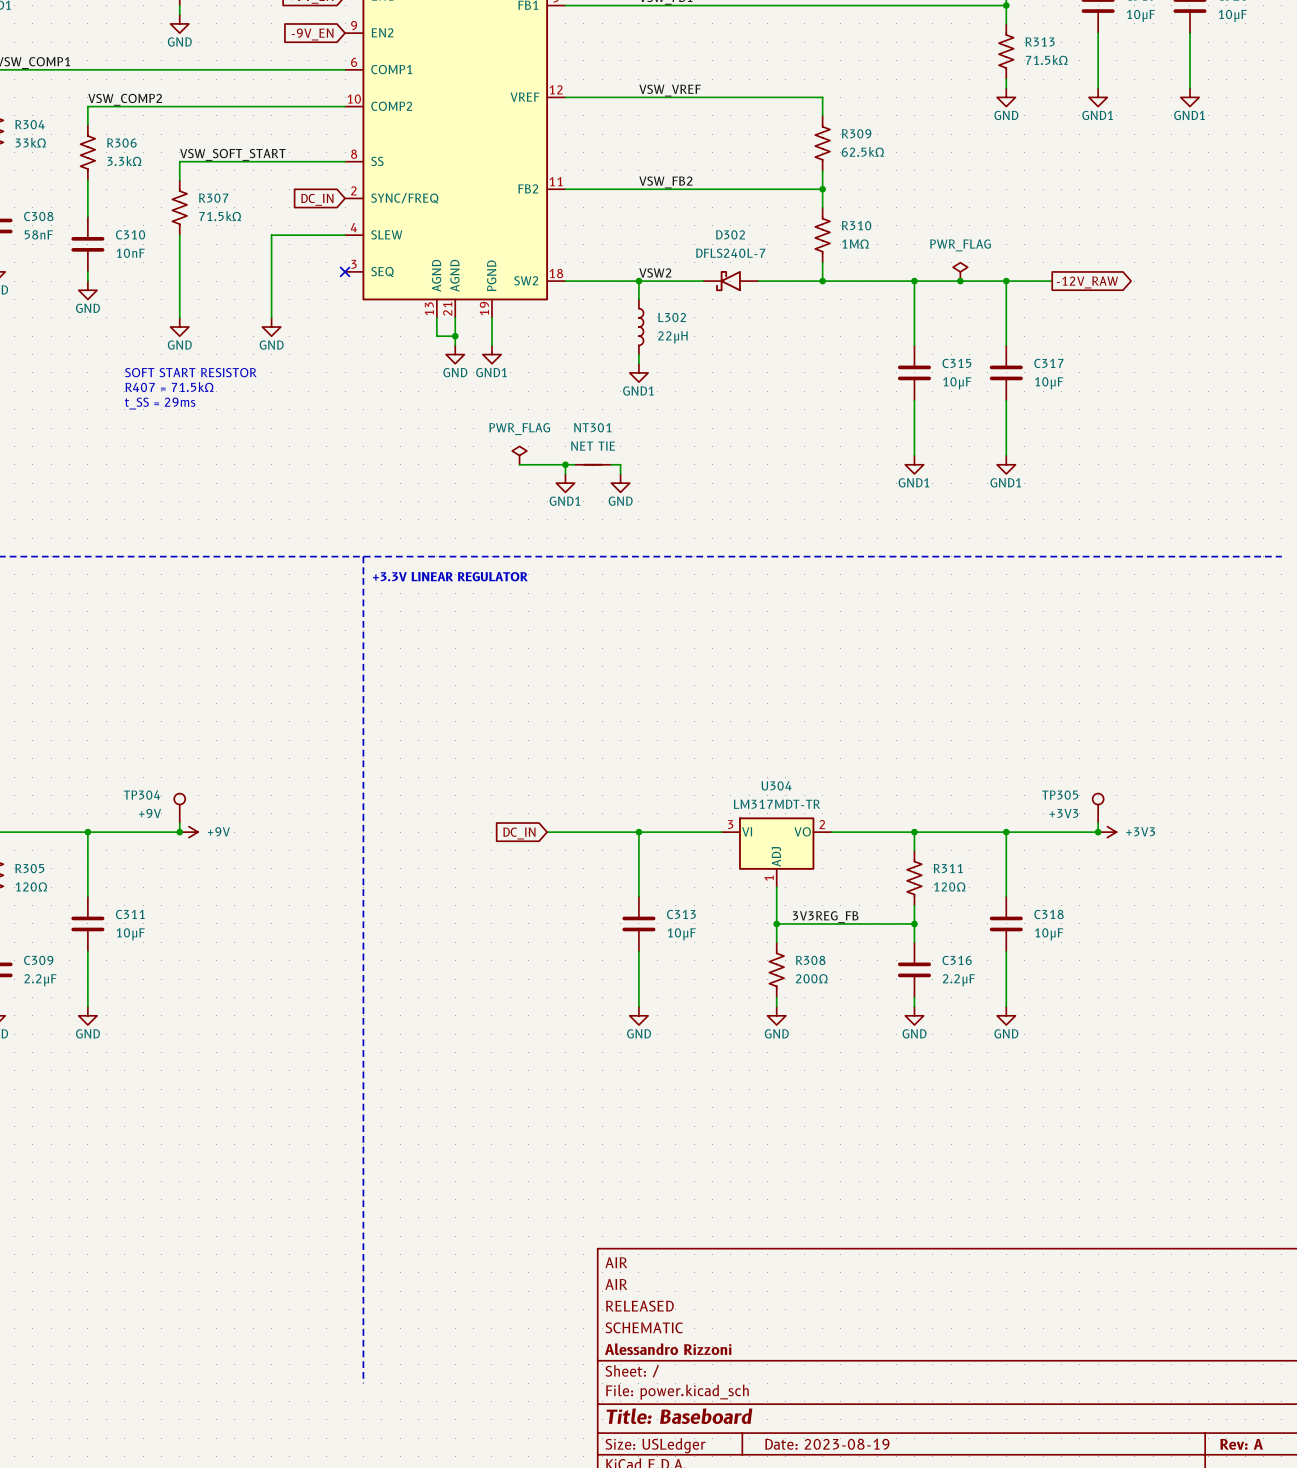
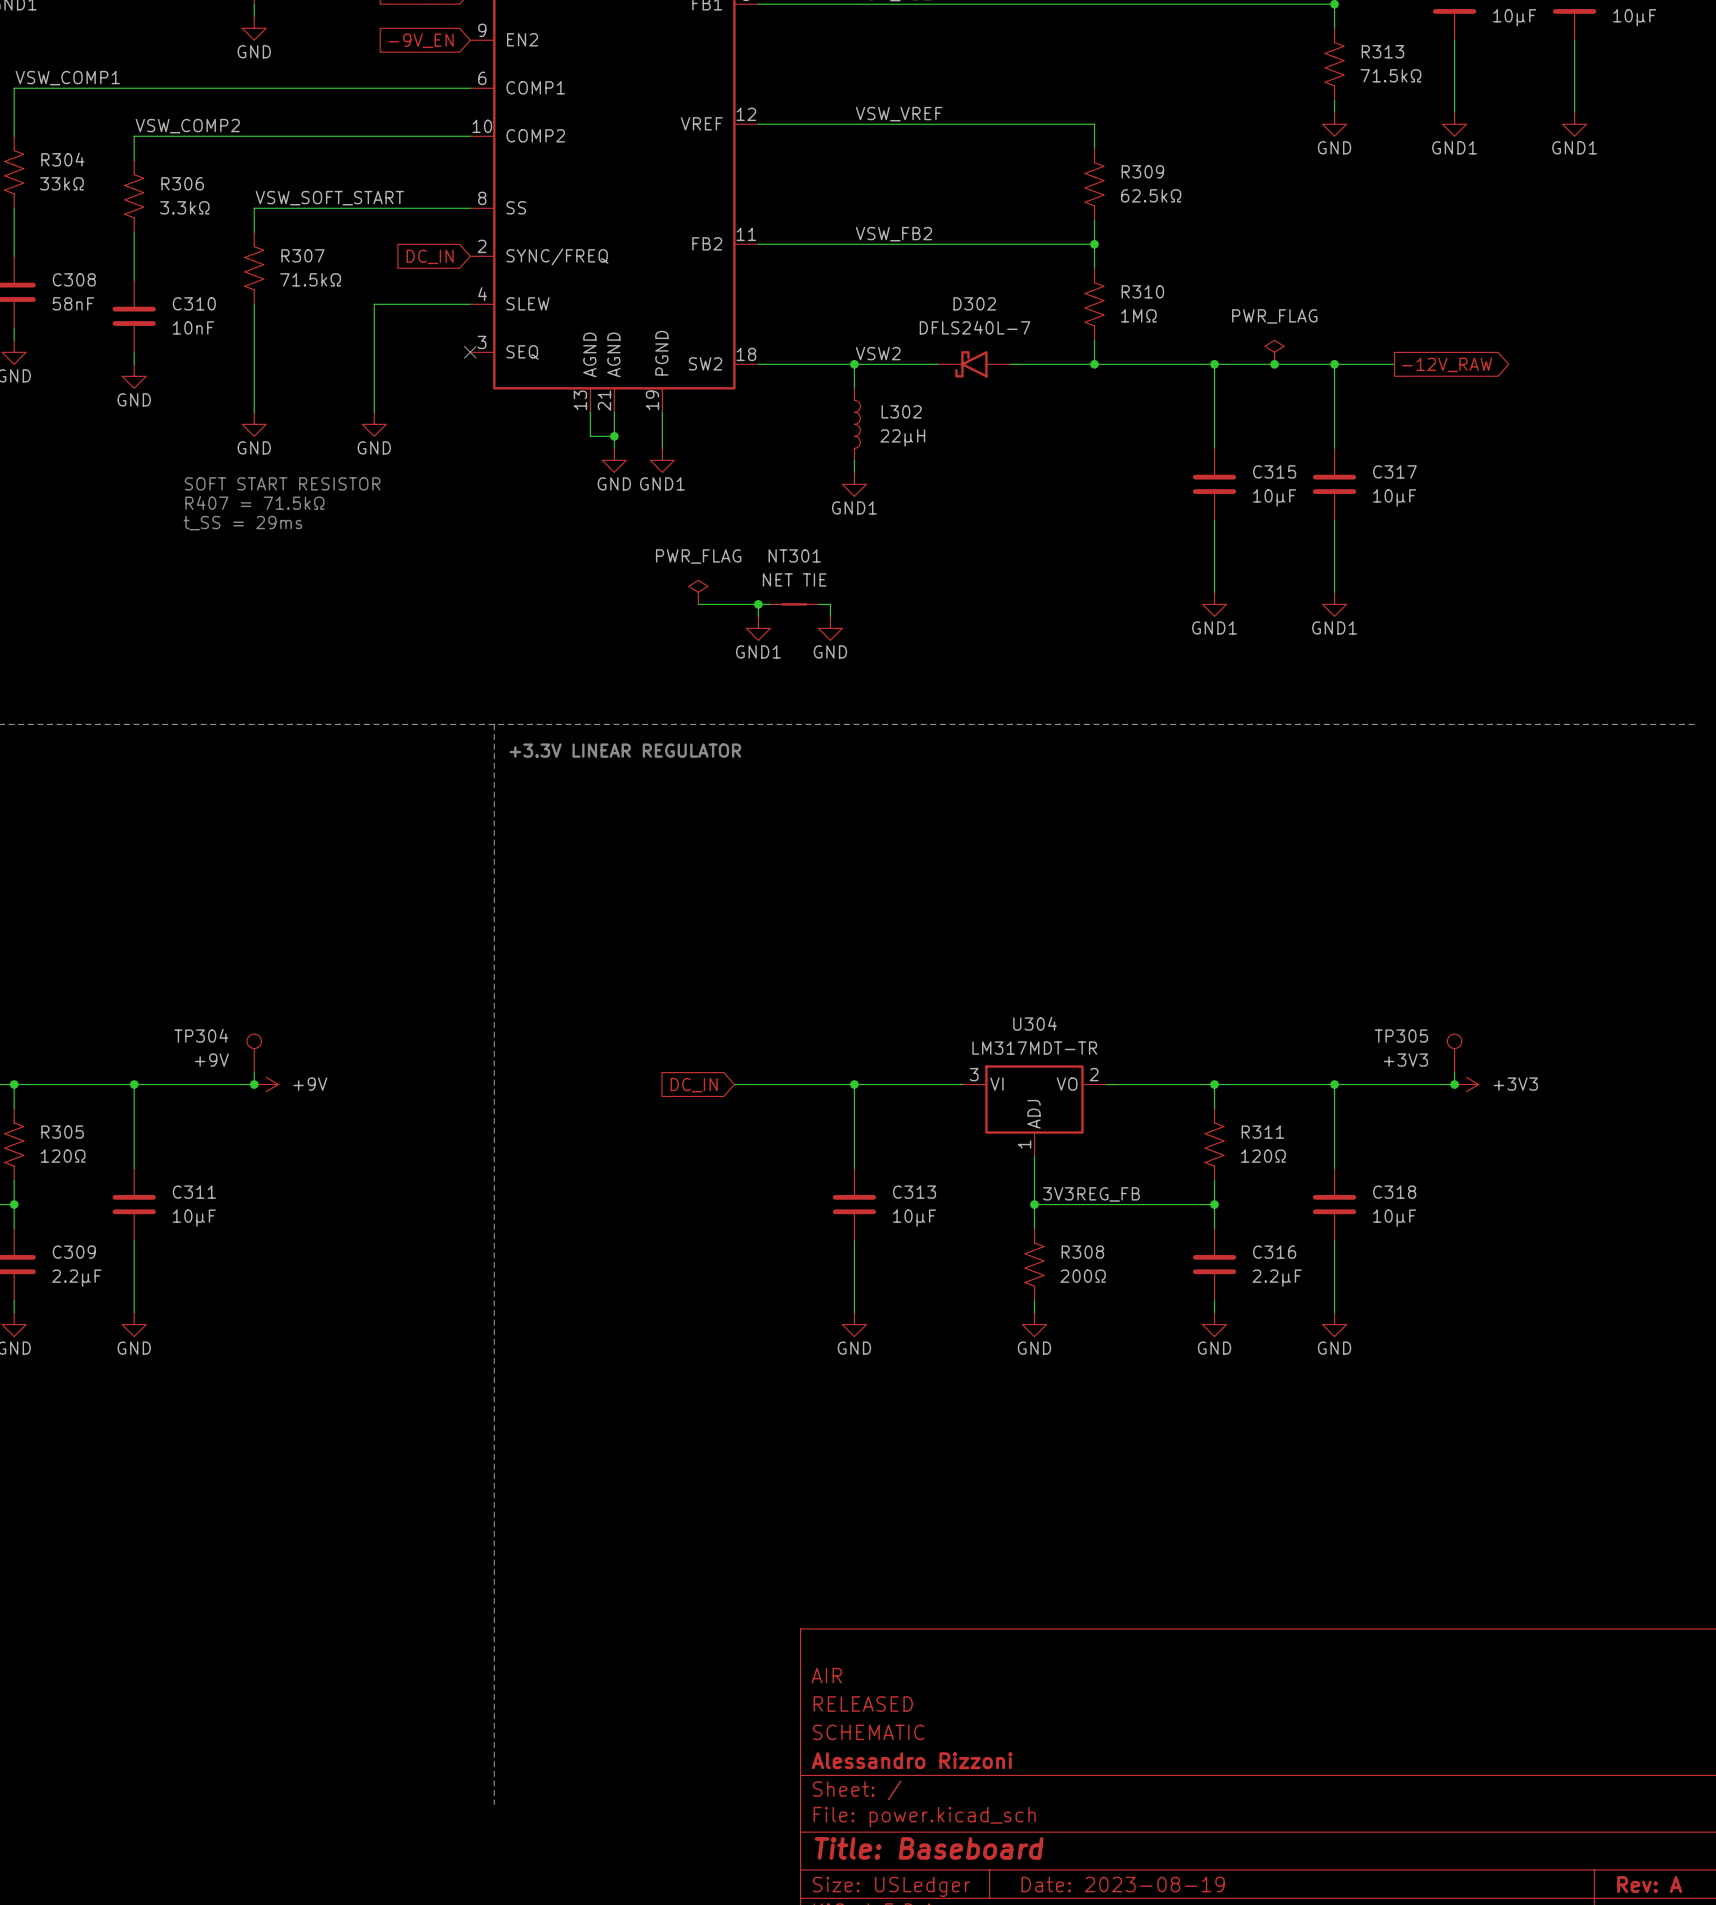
title block: AIR (616, 1262) -> none

